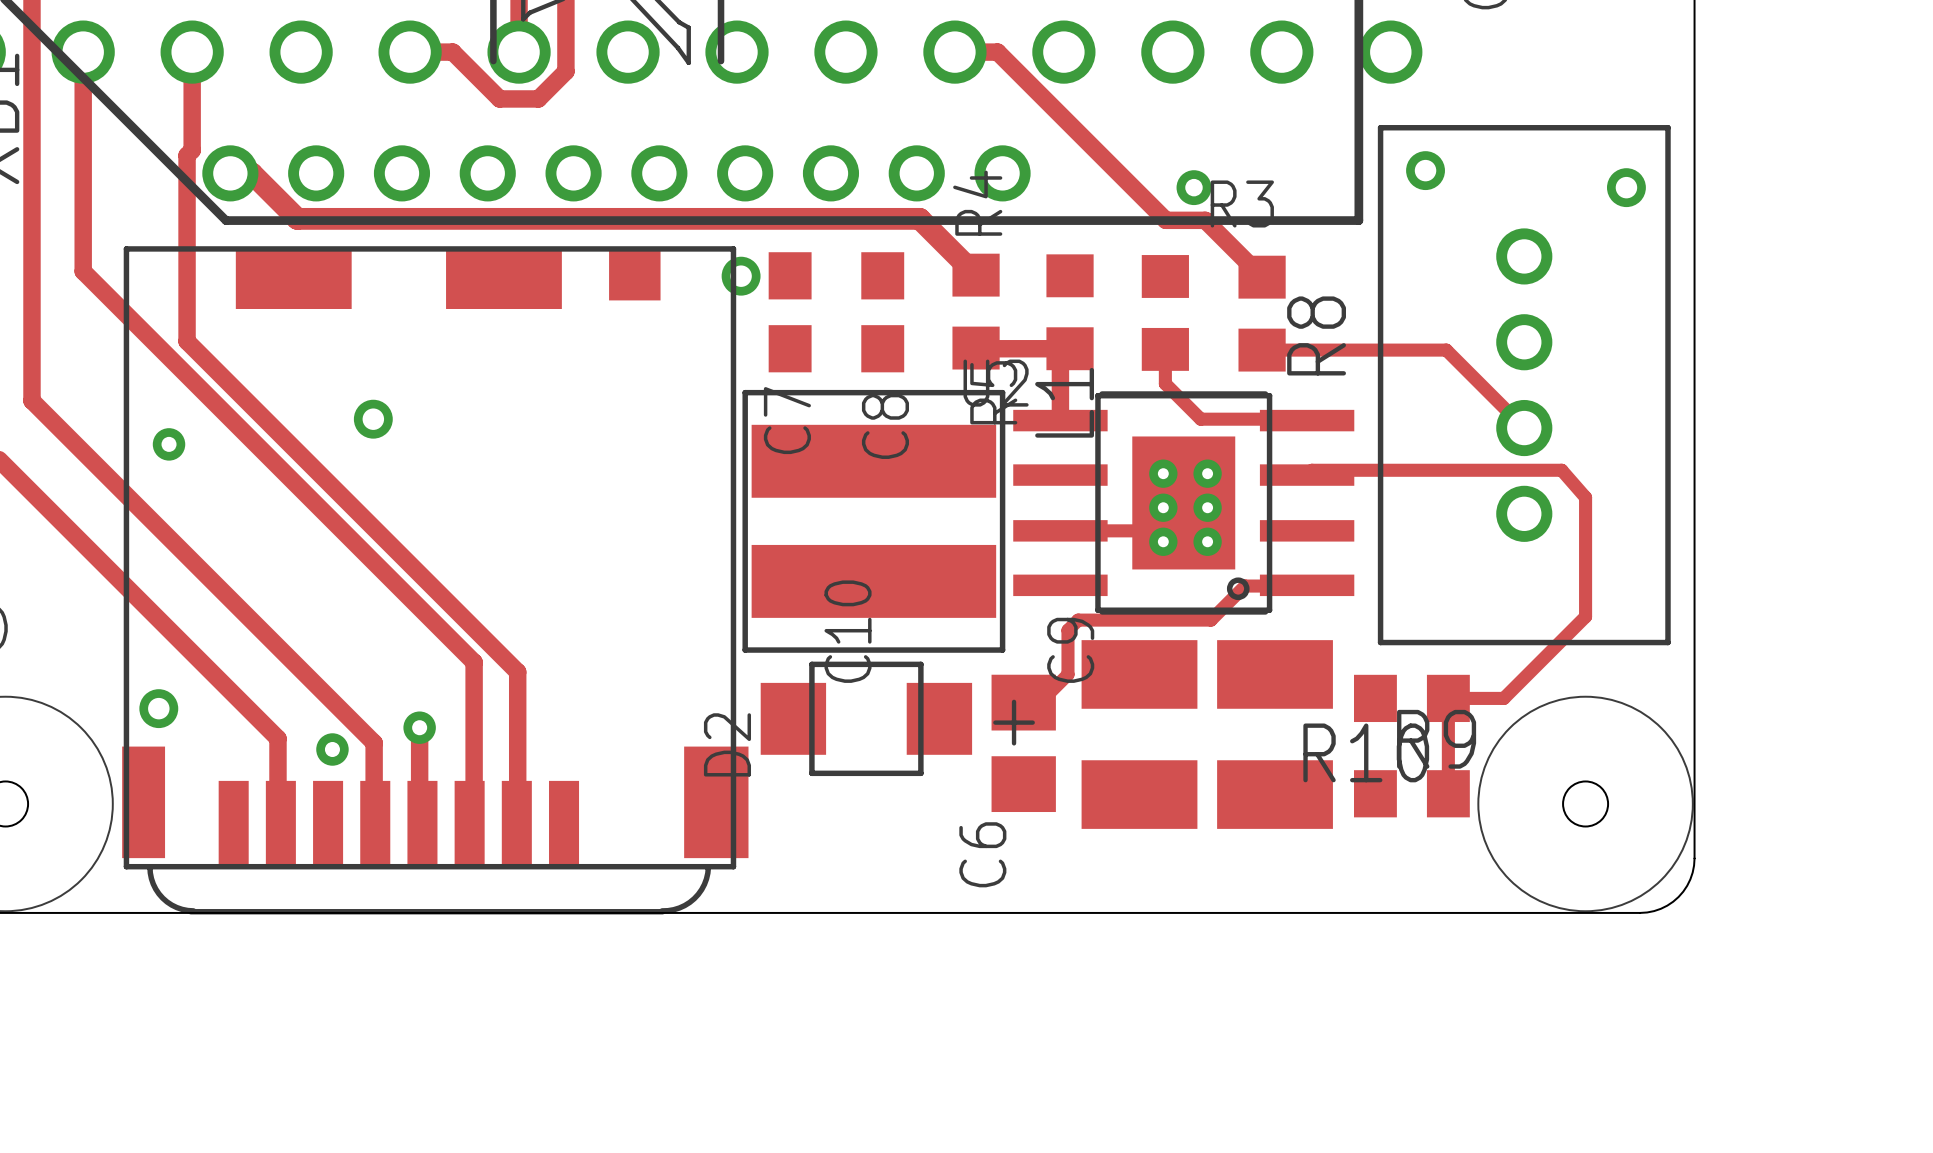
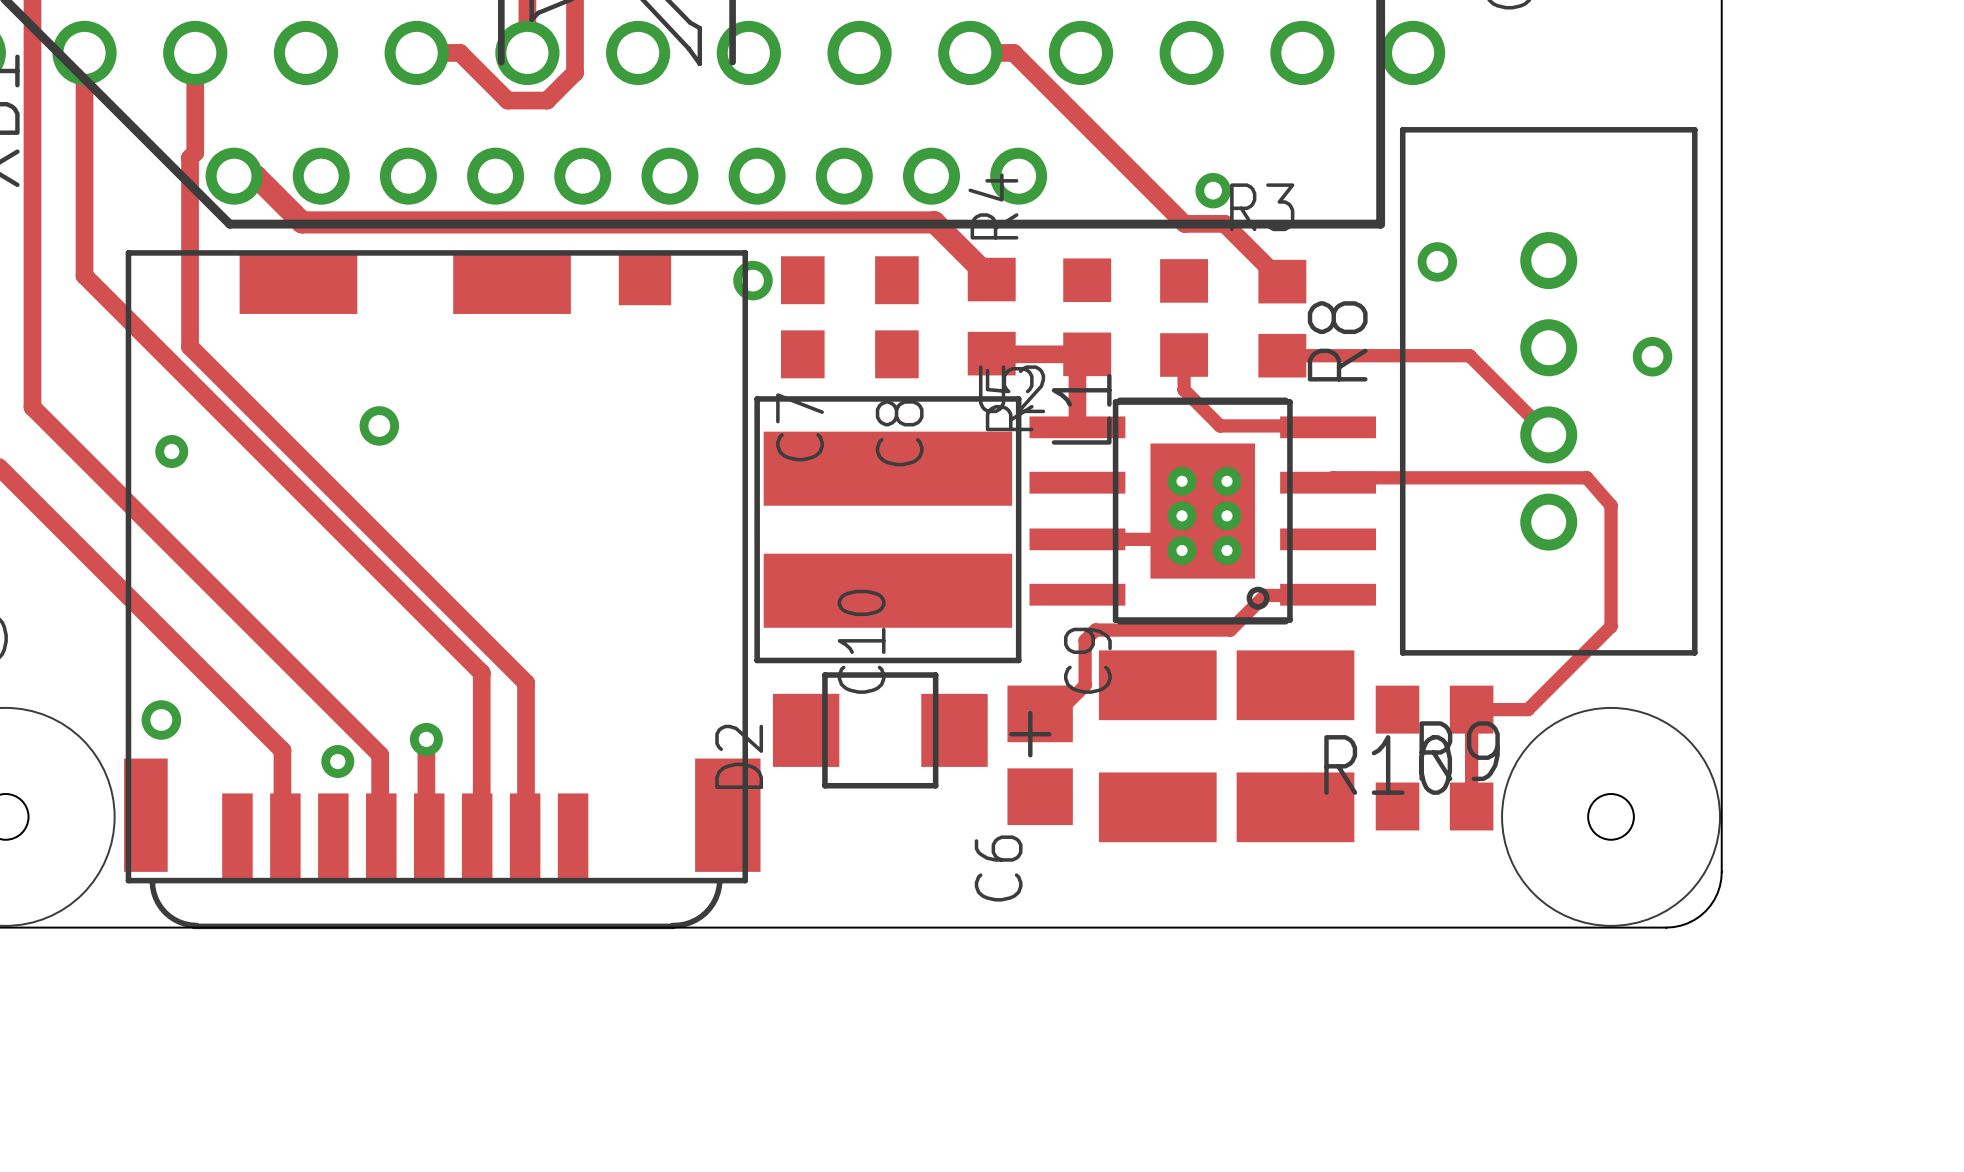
via position: (1425, 170) -> (1437, 261)
via: (1626, 187) -> none
via: none -> (1652, 356)

